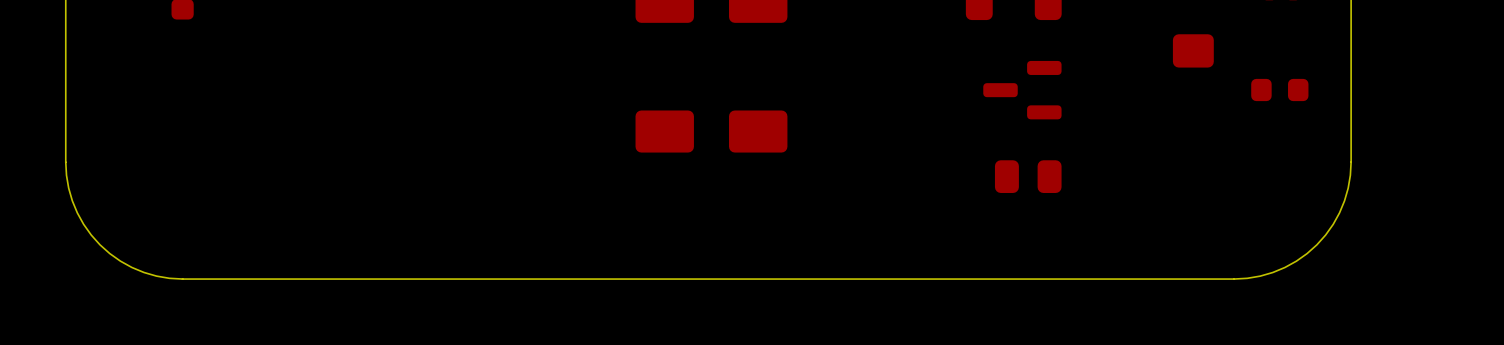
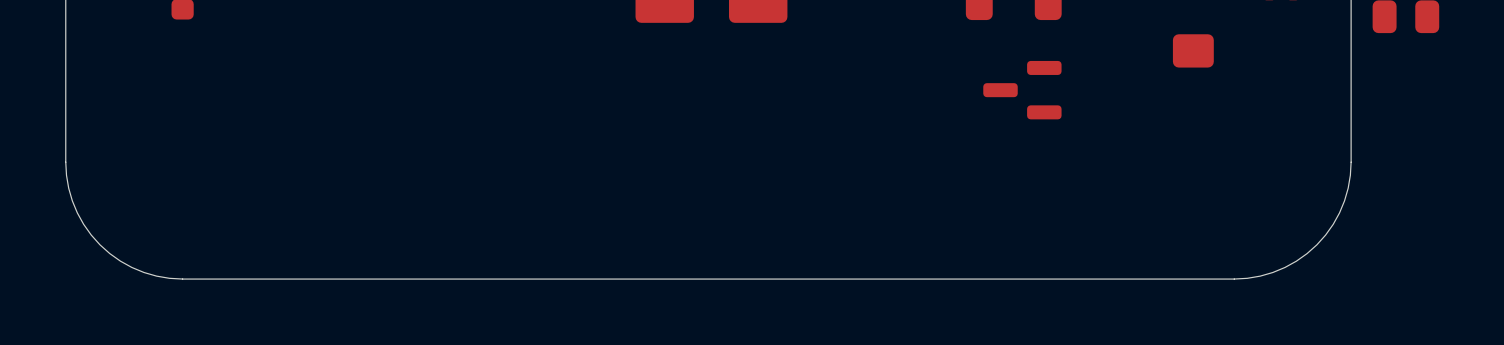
part: (1279, 89) -> none
part: (711, 131) -> none
part position: (1028, 176) -> (1405, 16)

